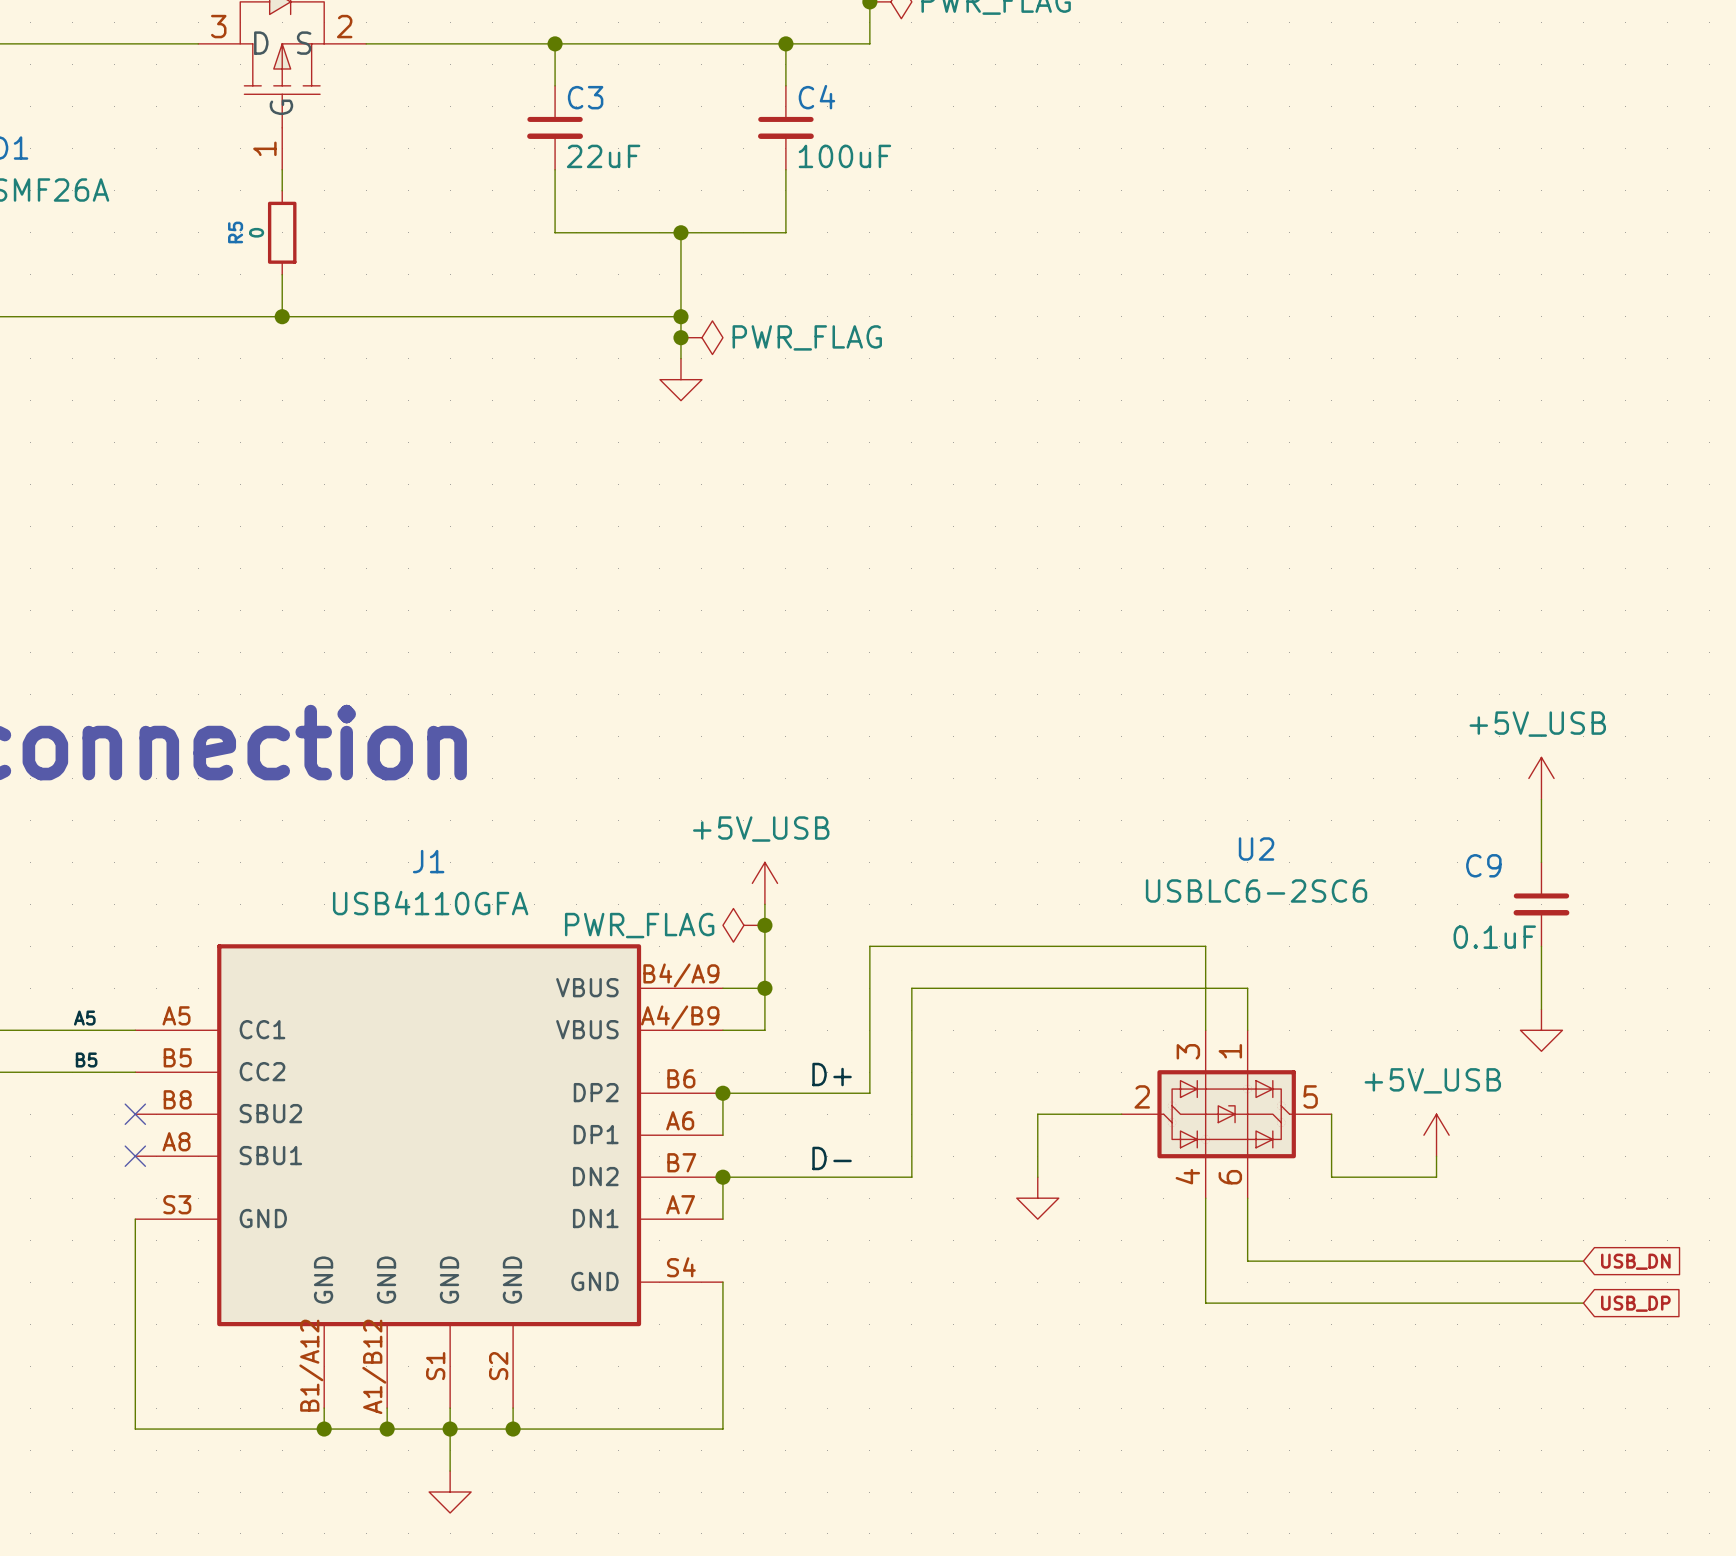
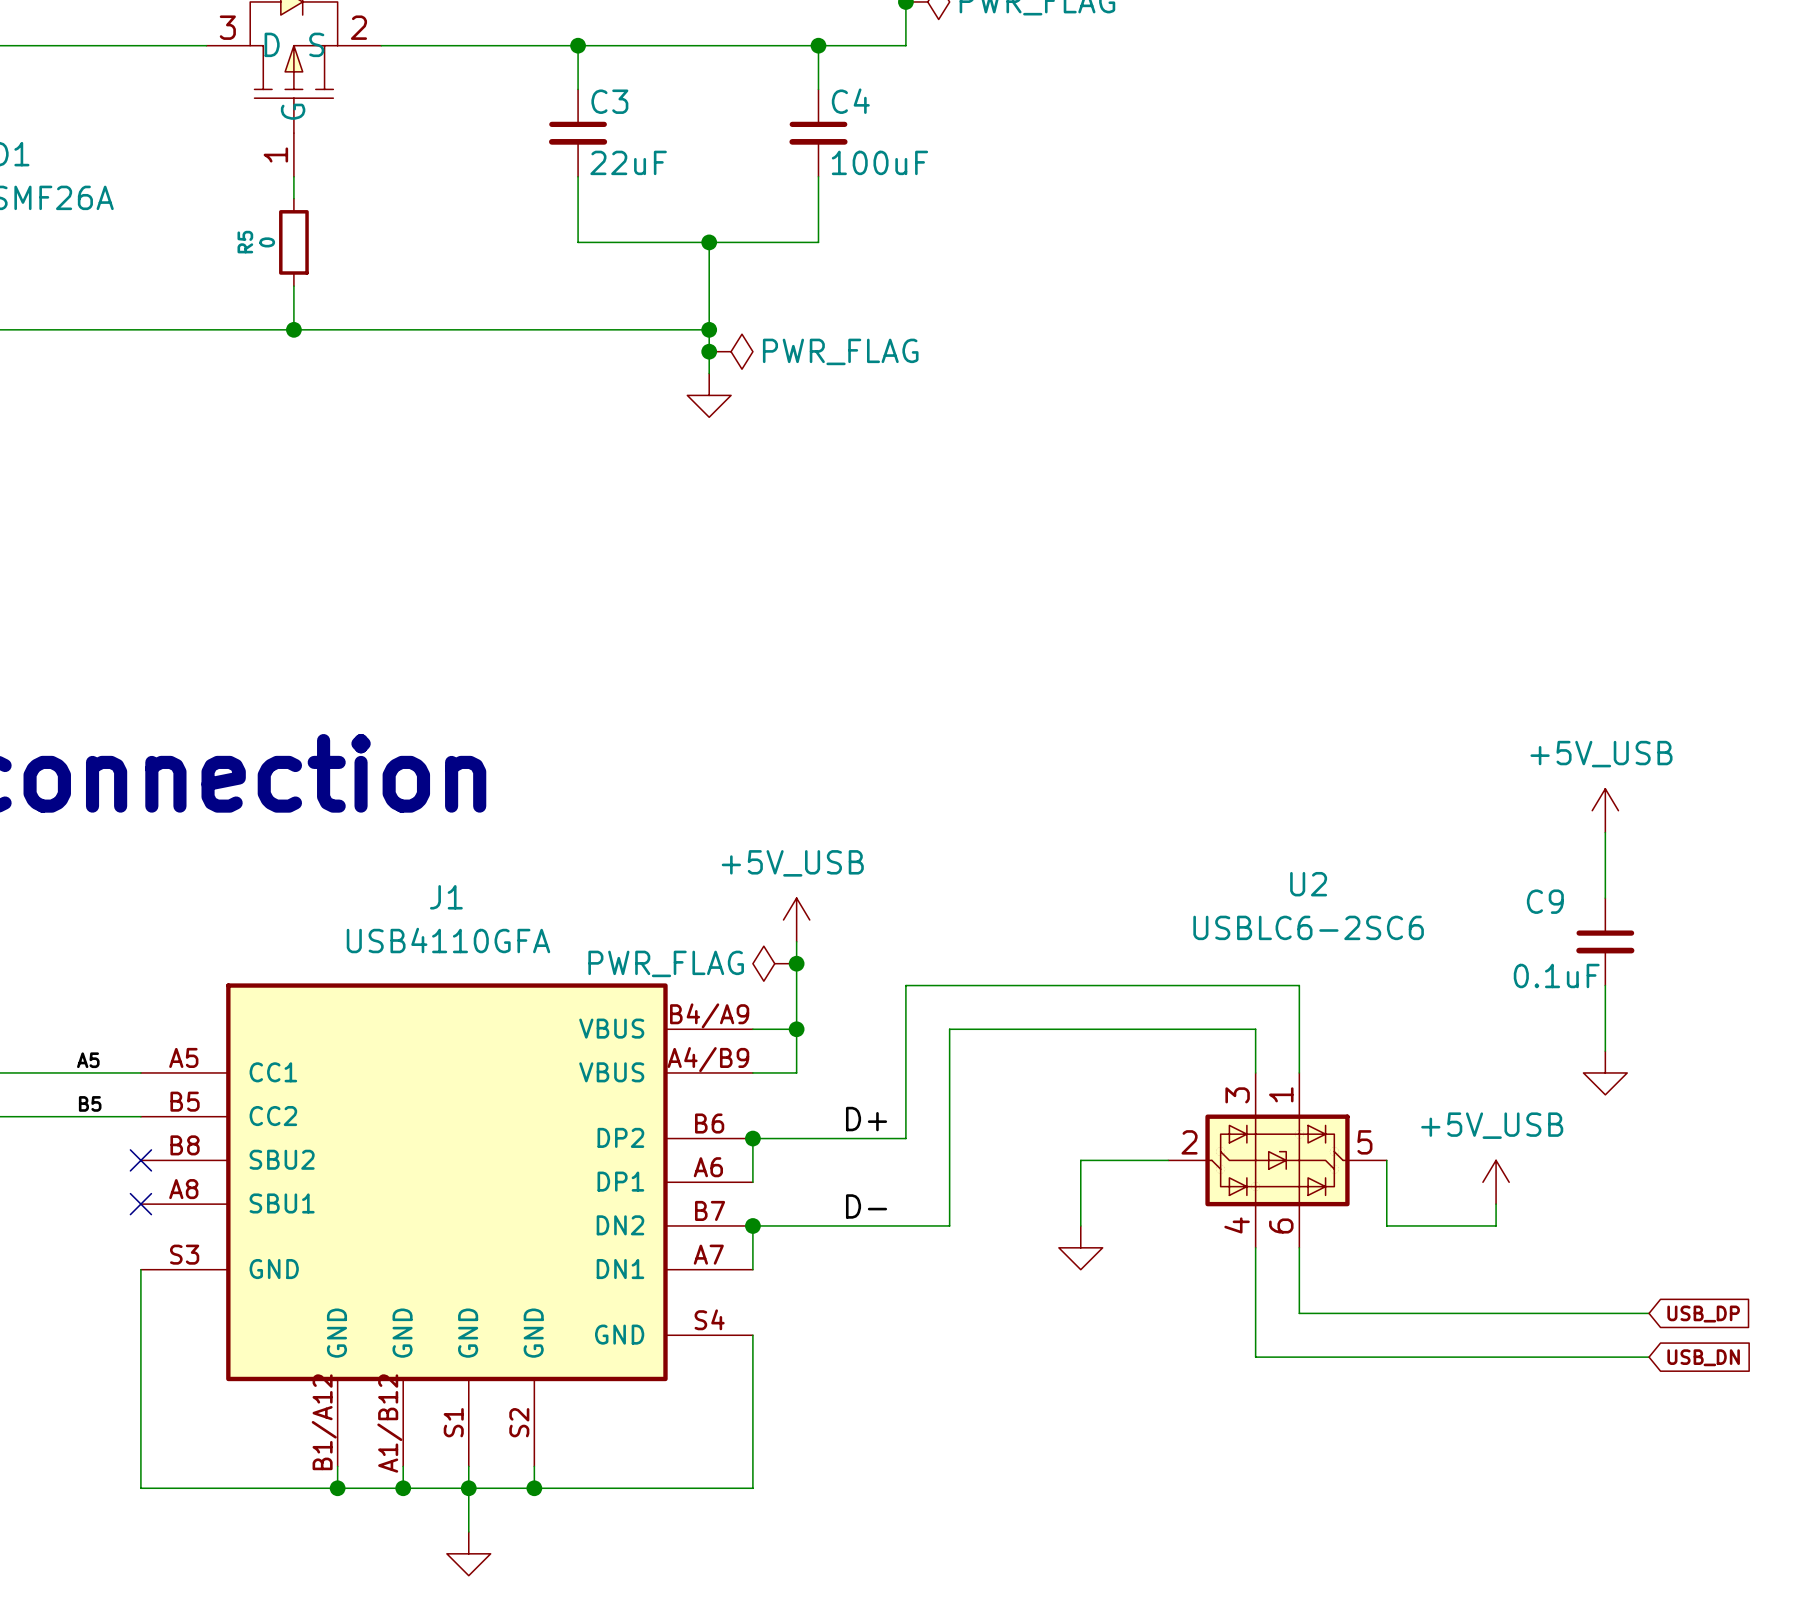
wire: (1205, 946) (1205, 988) (1247, 988) -> (1255, 985) (1299, 985) (1299, 1029)
global label: USB_DN (1635, 1261) -> USB_DP (1703, 1314)
global label: USB_DP (1635, 1303) -> USB_DN (1703, 1357)

